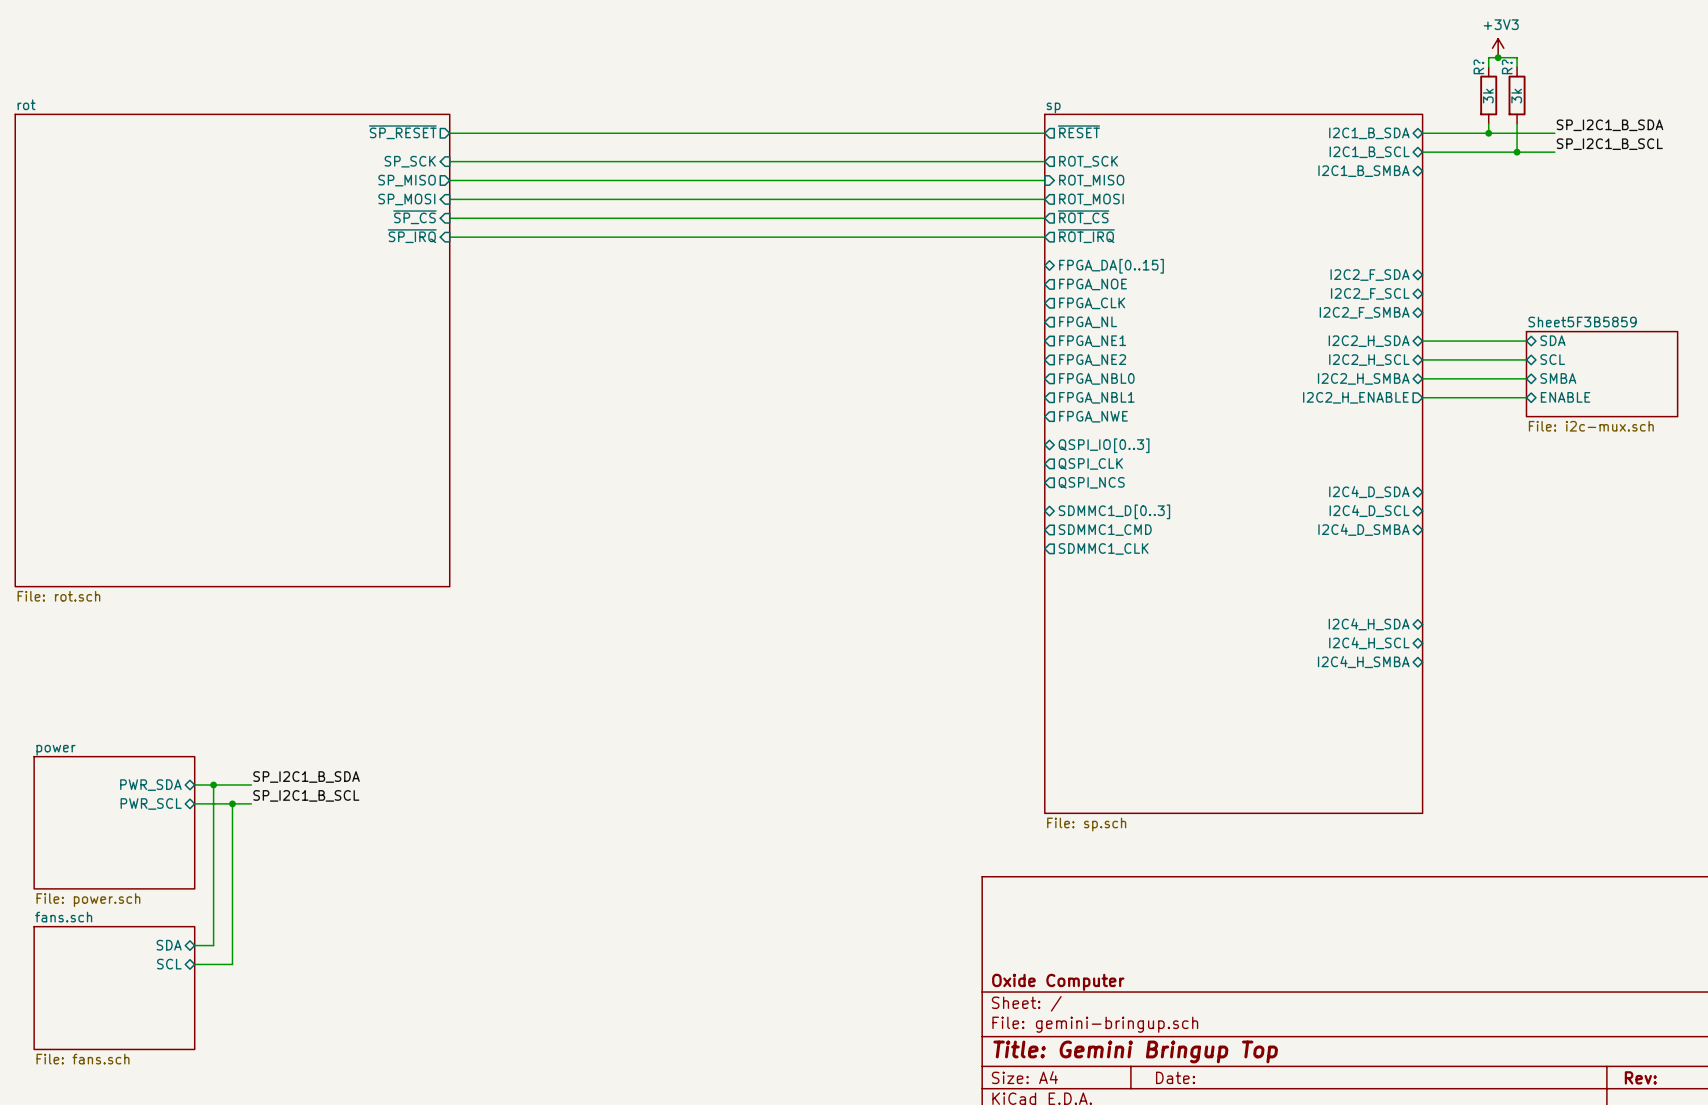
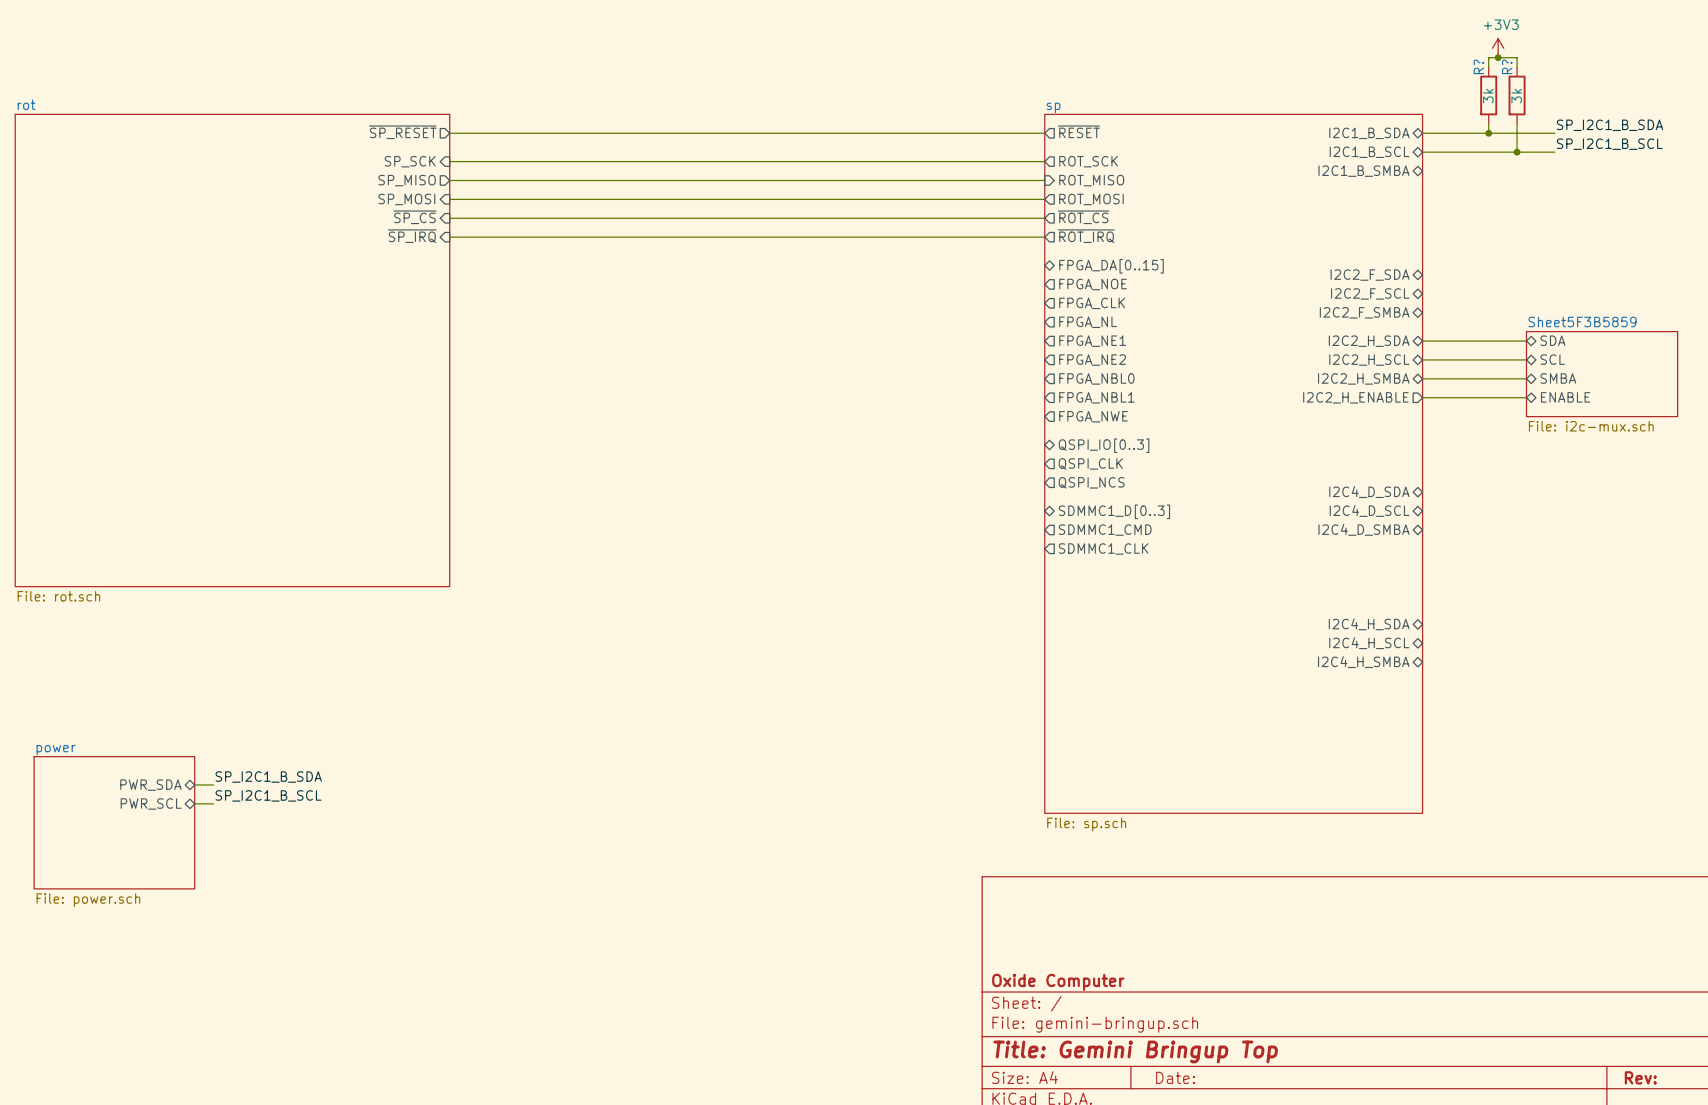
label position: SP_I2C1_B_SDA (306, 777) -> SP_I2C1_B_SDA (268, 777)
junction: (213, 784) -> none
wire: (251, 784) (213, 784) (213, 945) (194, 945) -> none
label position: SP_I2C1_B_SCL (306, 795) -> SP_I2C1_B_SCL (268, 795)
wire: (213, 803) (251, 803) -> none
wire: (232, 803) (232, 964) (194, 964) -> none
junction: (232, 803) -> none
sheet pin: SDA (169, 945) -> none
sheet pin: SCL (169, 964) -> none
sheet fans.sch: File: fans.sch (114, 988) -> none

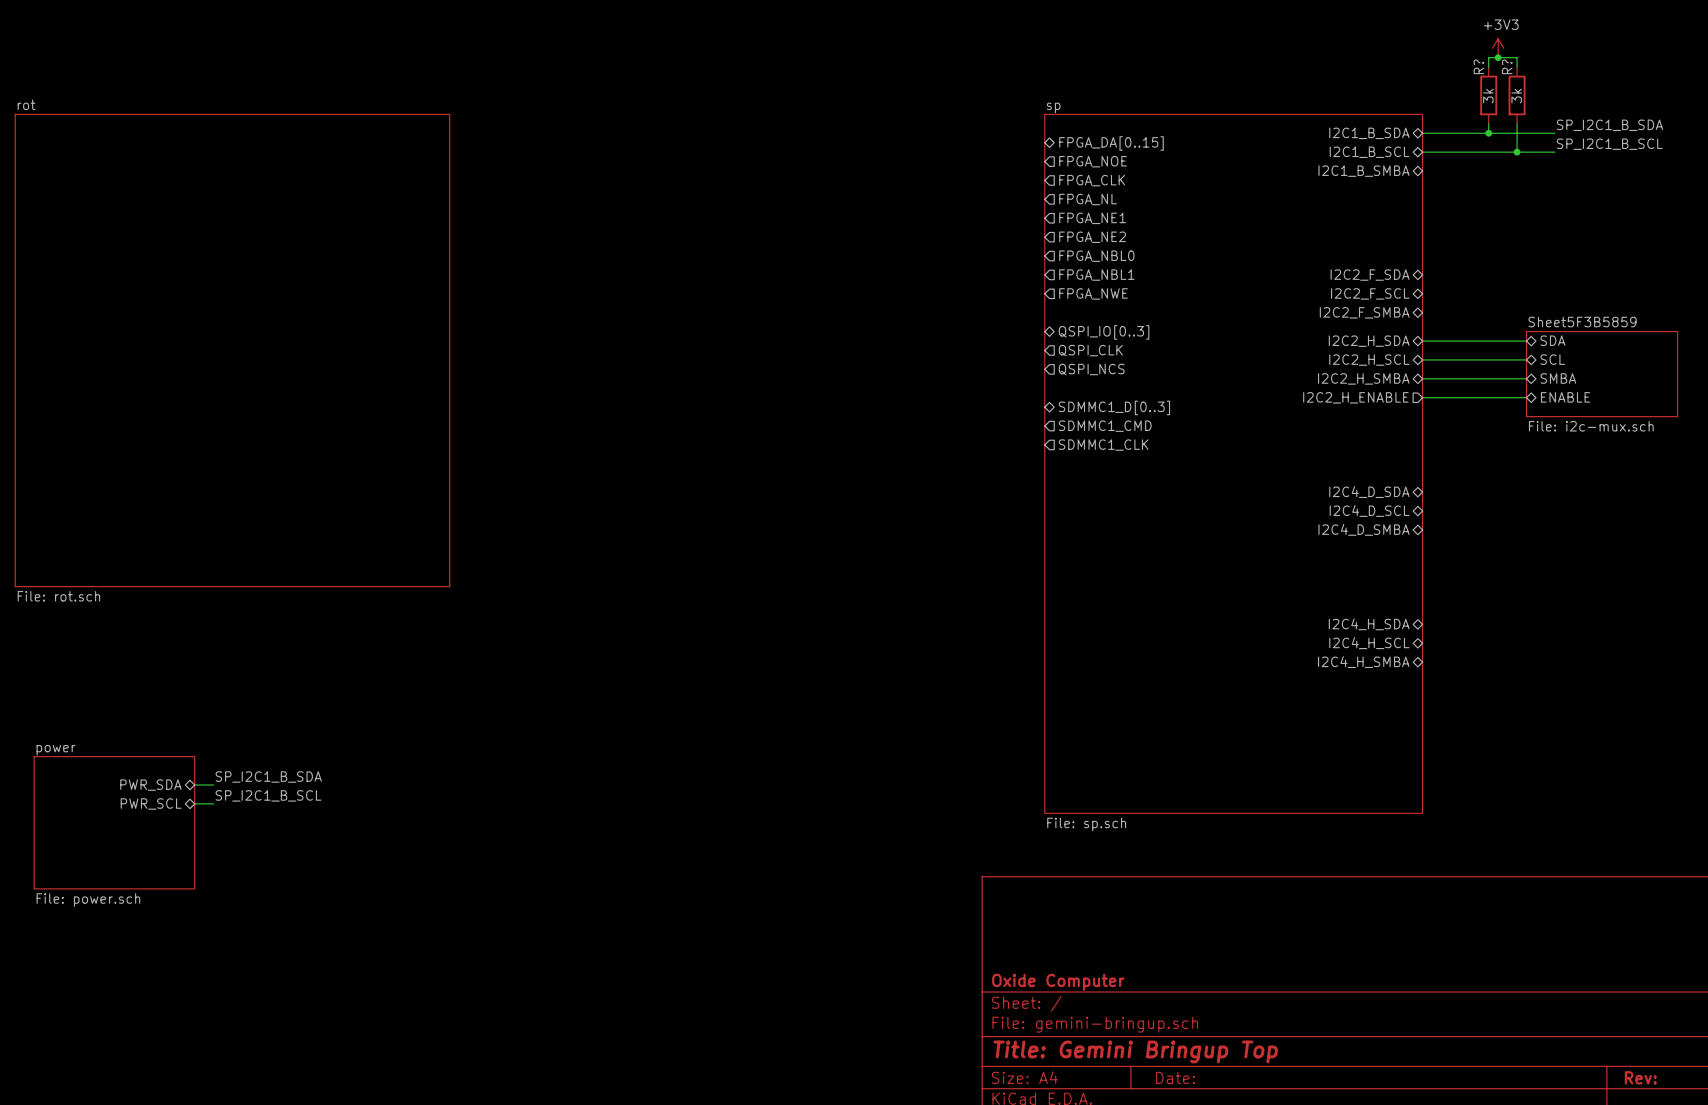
sheet pin: ~{RESET} (1078, 131) -> none
sheet pin: ~{SP_RESET} (402, 132) -> none
wire: (449, 133) (1044, 133) -> none
sheet pin: SP_SCK (410, 161) -> none
wire: (449, 161) (1044, 161) -> none
sheet pin: ROT_SCK (1088, 161) -> FPGA_NOE (1093, 161)
sheet pin: SP_MISO (407, 180) -> none
wire: (449, 180) (1044, 180) -> none
sheet pin shape: input (1091, 180) -> output (1092, 180)
sheet pin: ROT_MISO (1091, 180) -> FPGA_CLK (1092, 180)
sheet pin: SP_MOSI (406, 199) -> none
wire: (449, 199) (1044, 199) -> none
sheet pin: ROT_MOSI (1091, 199) -> FPGA_NL (1088, 199)
sheet pin: ~{SP_CS} (414, 217) -> none
sheet pin: ~{ROT_CS} (1083, 217) -> FPGA_NE1 (1092, 218)
wire: (449, 218) (1044, 218) -> none
sheet pin: ~{SP_IRQ} (412, 236) -> none
sheet pin: ~{ROT_IRQ} (1086, 236) -> FPGA_NE2 (1092, 237)
wire: (449, 237) (1044, 237) -> none
sheet pin position: FPGA_DA[0..15] (1111, 266) -> FPGA_DA[0..15] (1111, 143)
sheet pin: FPGA_NOE (1093, 284) -> none
sheet pin: FPGA_CLK (1092, 303) -> none
sheet pin: FPGA_NL (1088, 322) -> none
sheet pin: none -> QSPI_IO[0..3] (1104, 332)
sheet pin: FPGA_NE1 (1092, 341) -> none
sheet pin: FPGA_NE2 (1092, 360) -> none
sheet pin position: FPGA_NBL0 (1096, 378) -> FPGA_NBL0 (1096, 256)
sheet pin position: FPGA_NBL1 (1096, 397) -> FPGA_NBL1 (1096, 275)
sheet pin position: FPGA_NWE (1093, 416) -> FPGA_NWE (1093, 293)
sheet pin shape: bidirectional (1104, 445) -> output (1103, 445)
sheet pin: QSPI_IO[0..3] (1104, 445) -> SDMMC1_CLK (1103, 445)
sheet pin position: QSPI_CLK (1090, 463) -> QSPI_CLK (1090, 350)
sheet pin position: QSPI_NCS (1091, 482) -> QSPI_NCS (1091, 369)
sheet pin position: SDMMC1_D[0..3] (1114, 511) -> SDMMC1_D[0..3] (1114, 407)
sheet pin position: SDMMC1_CMD (1105, 530) -> SDMMC1_CMD (1105, 426)
sheet pin: SDMMC1_CLK (1103, 548) -> none

